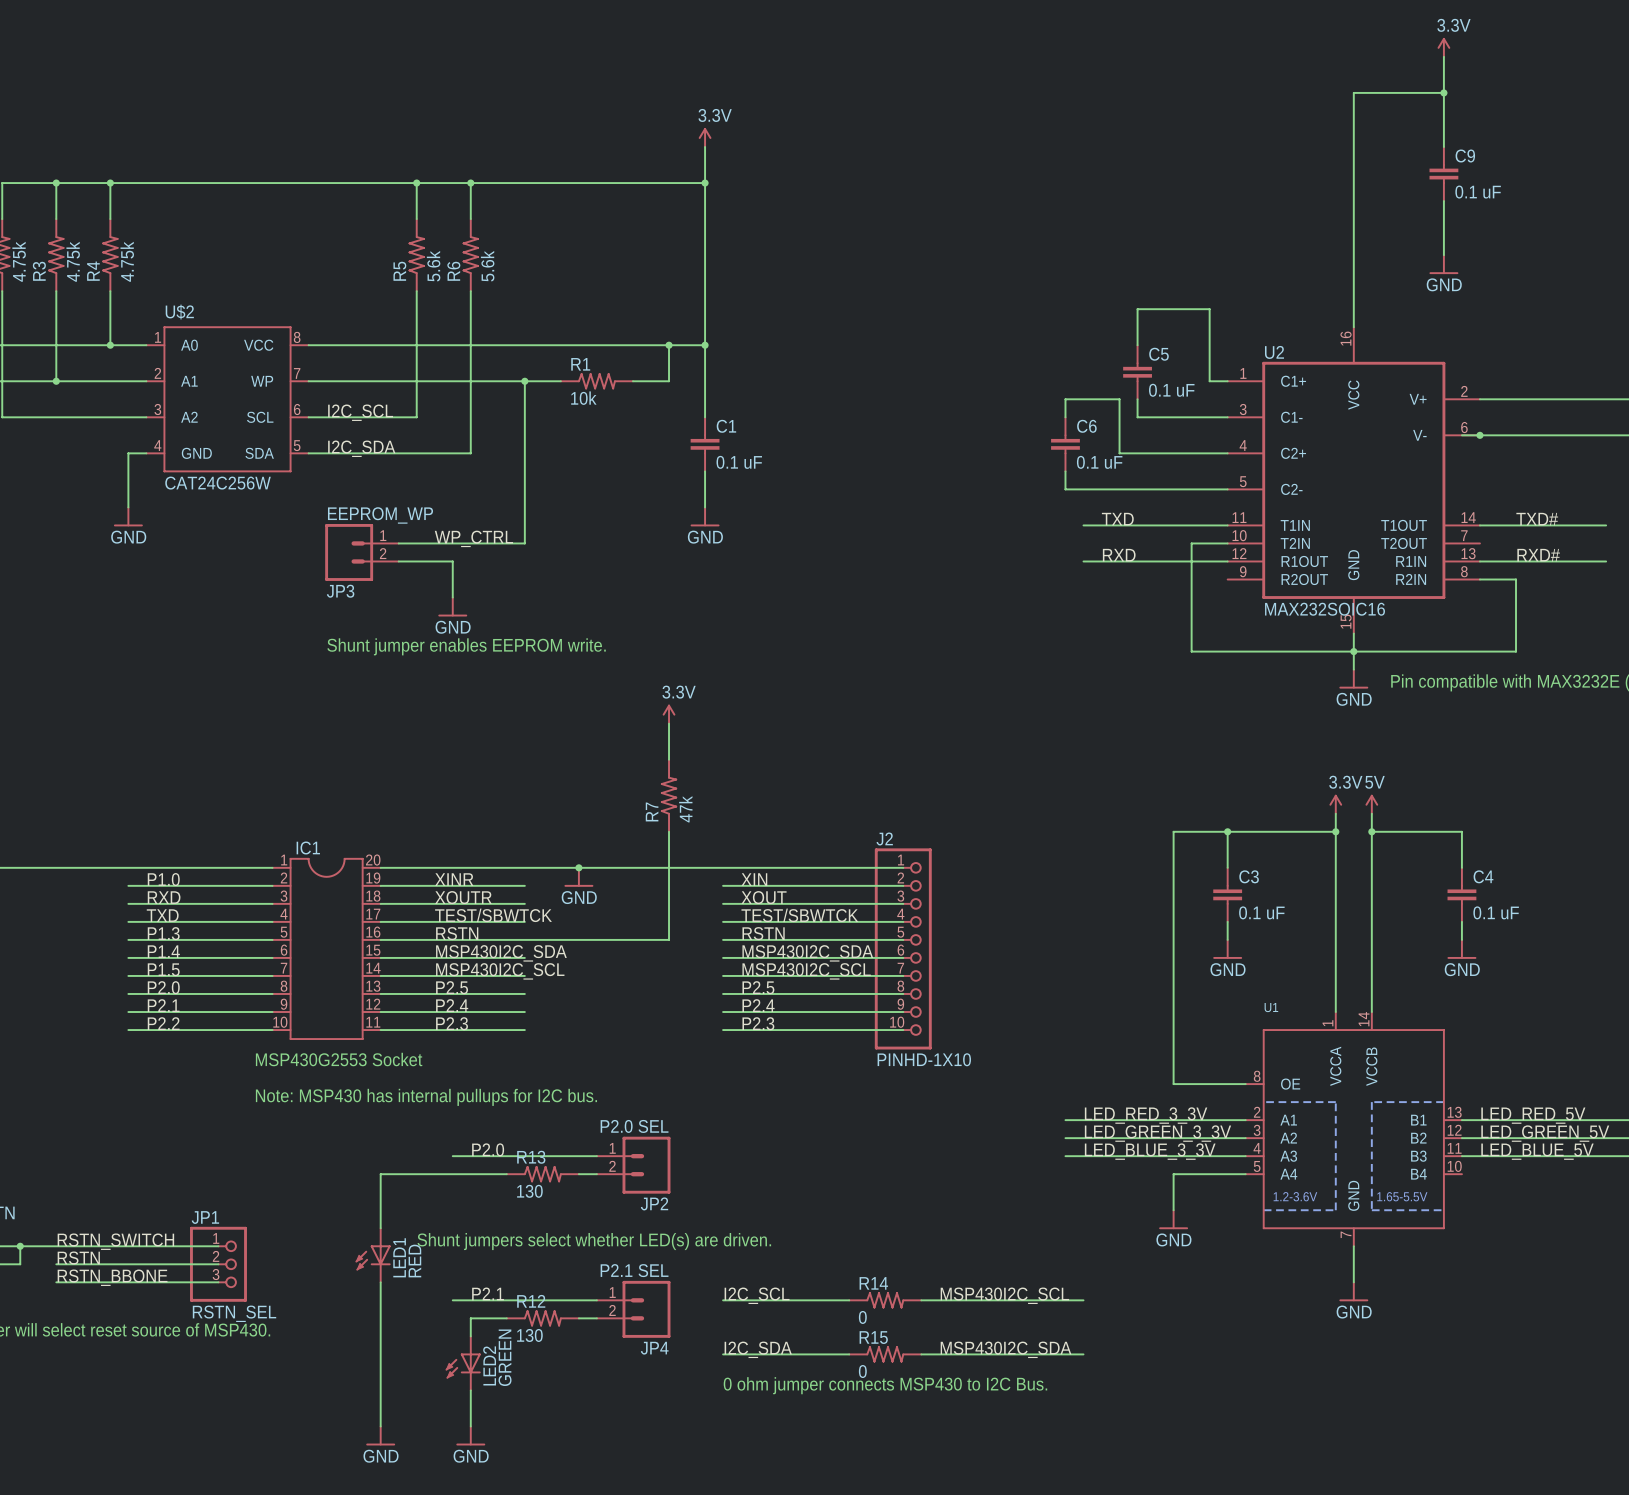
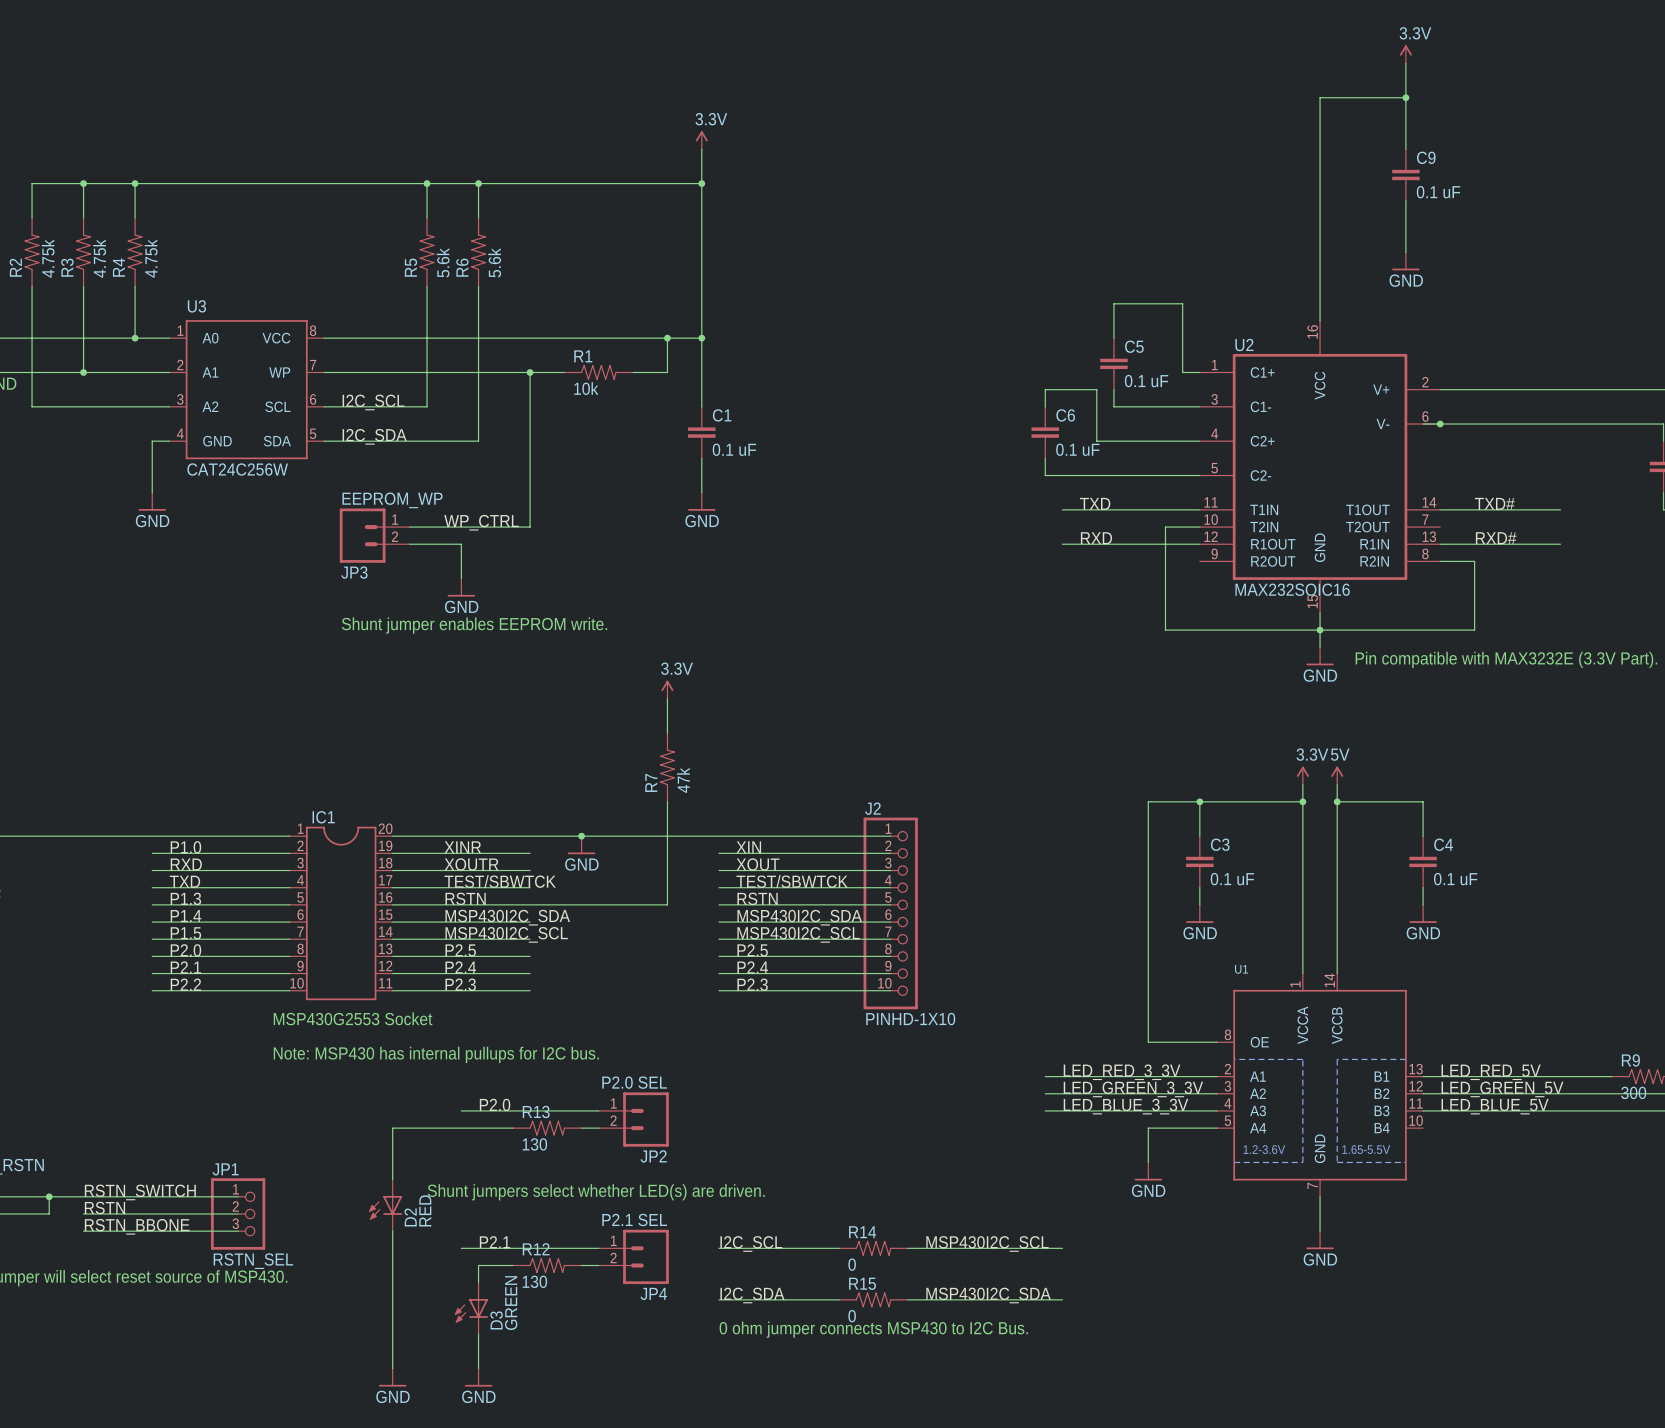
U$2 name: U$2 (179, 312) -> U3 (196, 306)
LED1 name: LED1 (399, 1257) -> D2 (410, 1217)
LED2 name: LED2 (489, 1365) -> D3 (496, 1320)

